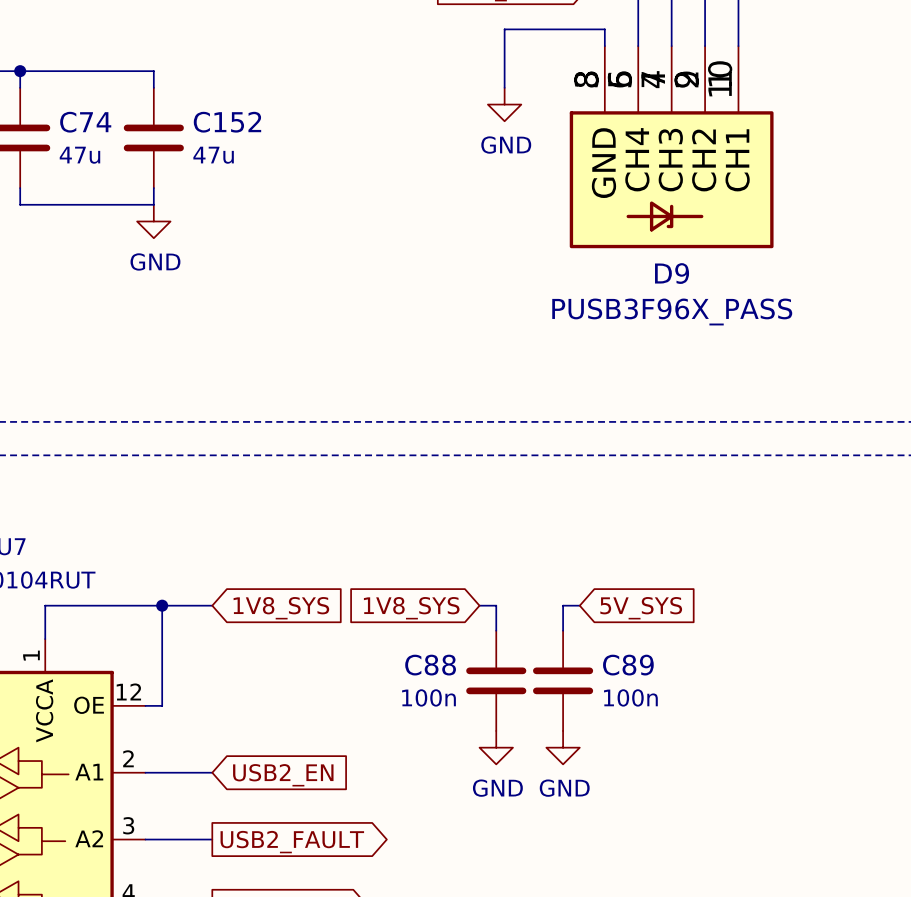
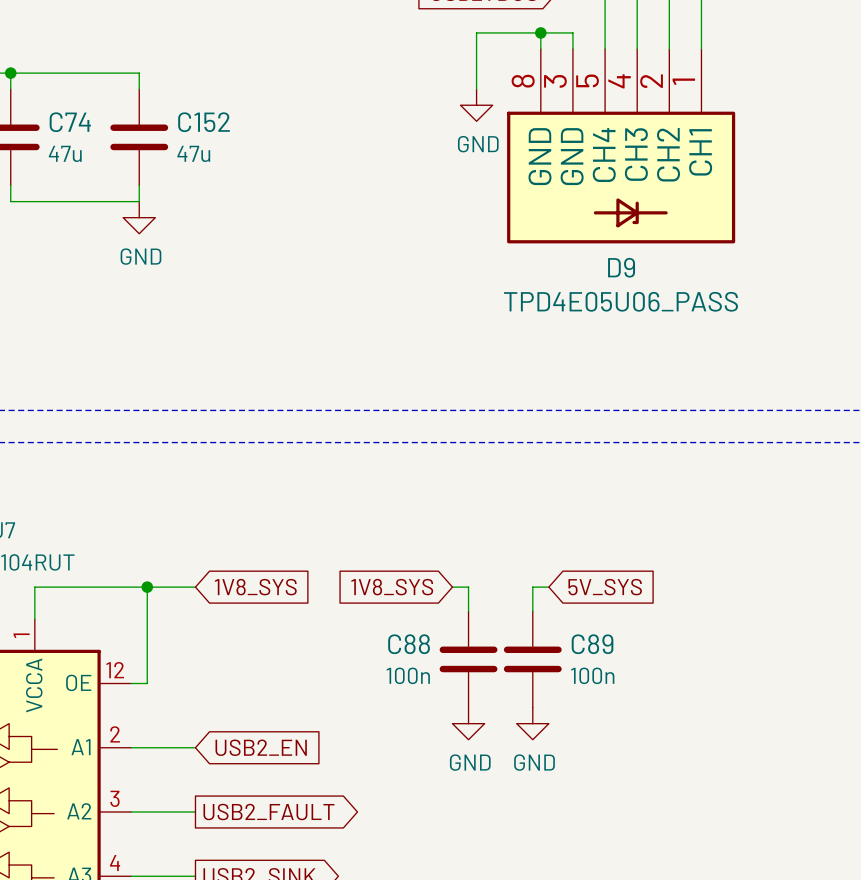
wire: none -> (540, 32) (540, 49)
junction: none -> (540, 32)
D9 symbol: [569, 46, 774, 249] -> [507, 49, 736, 244]
D9 value: PUSB3F96X_PASS (672, 311) -> TPD4E05U06_PASS (620, 301)

